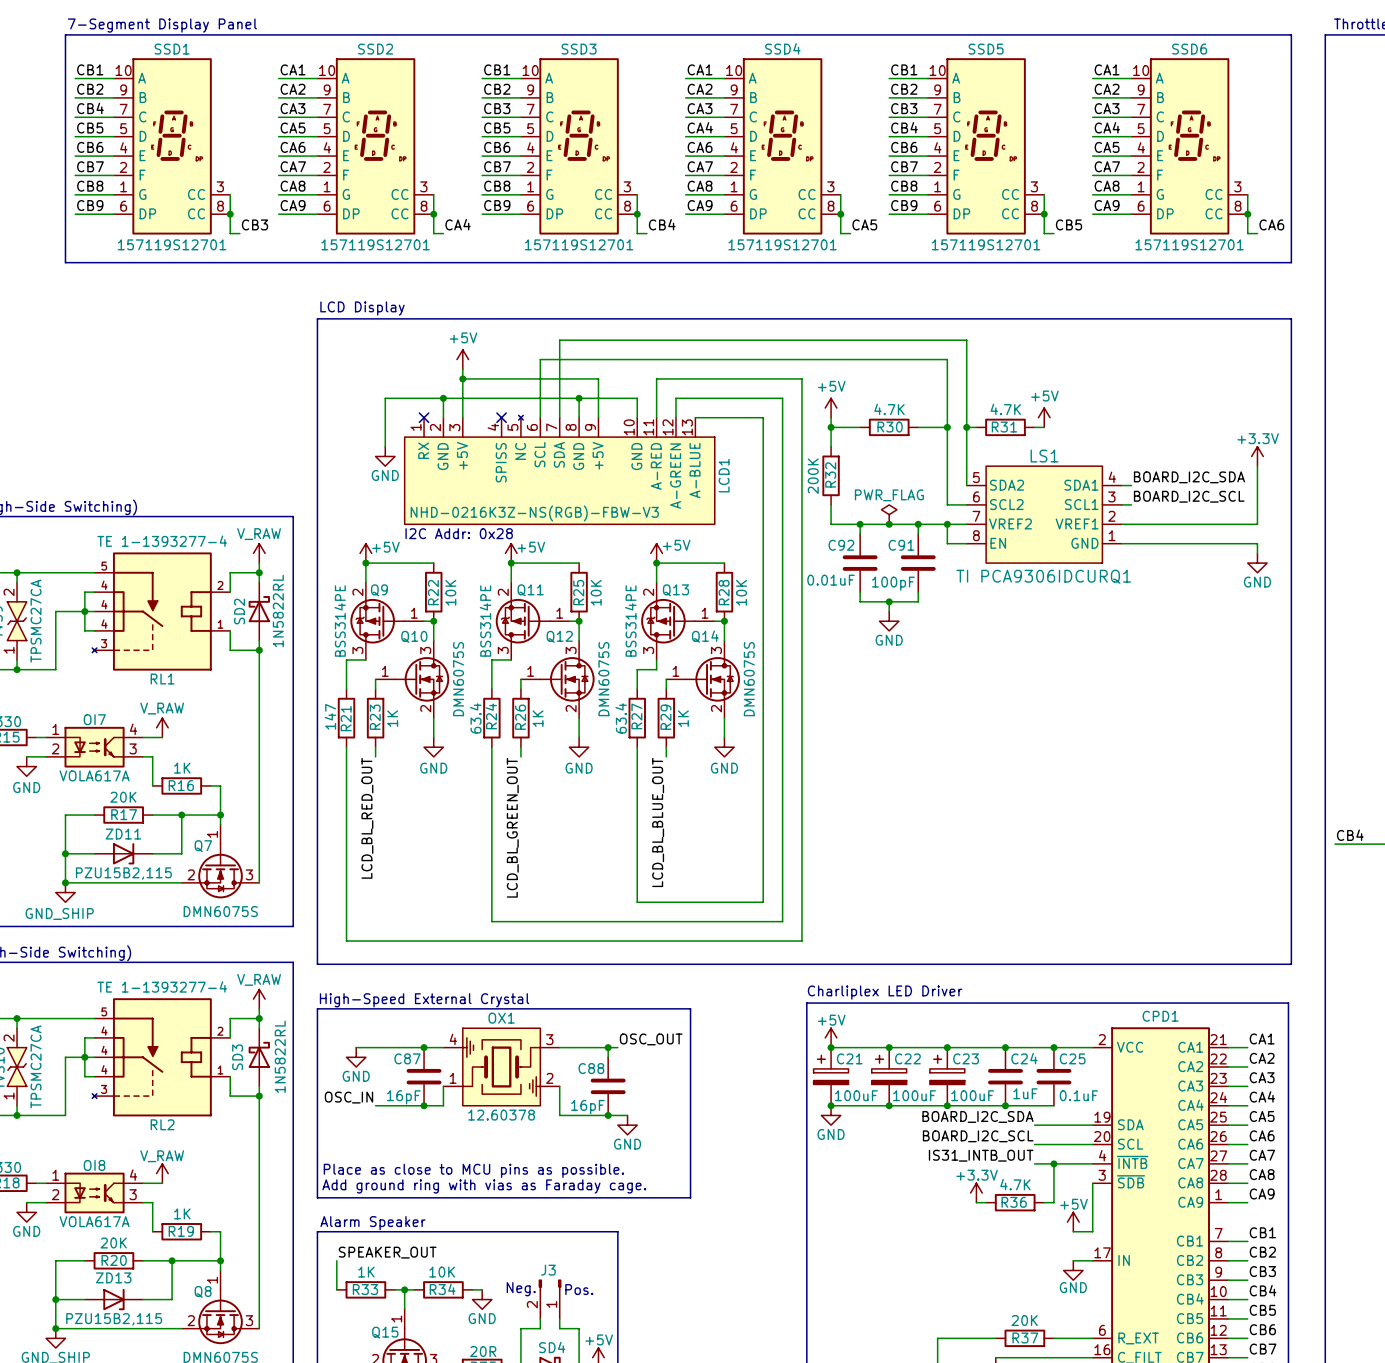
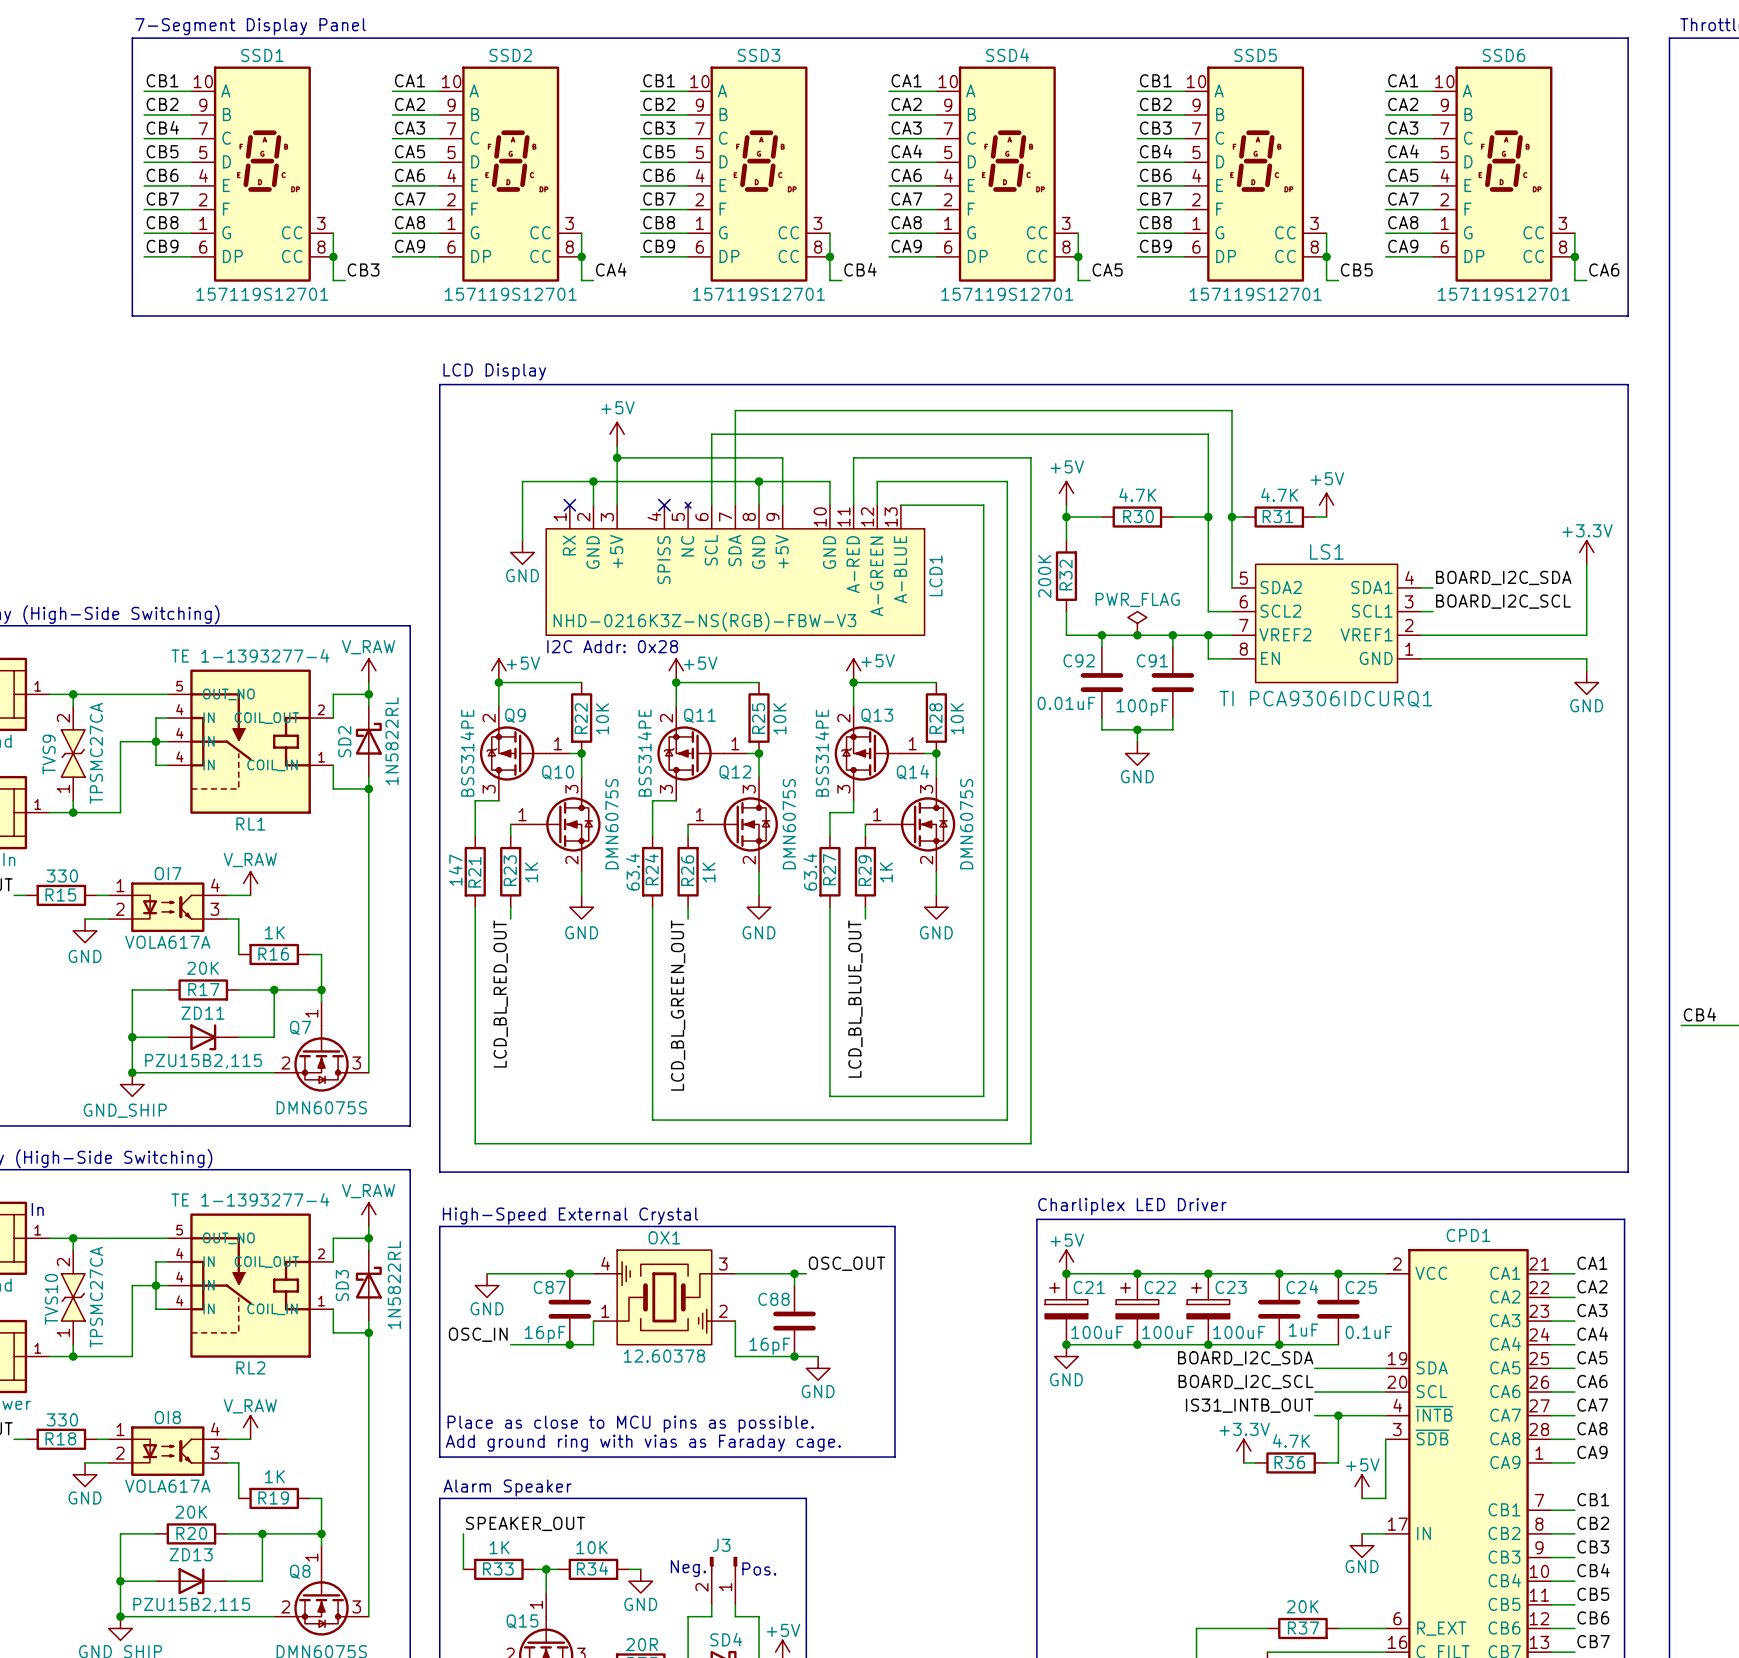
RL1 symbol: [92, 552, 231, 671] -> [167, 669, 334, 814]
RL2 symbol: [92, 998, 231, 1117] -> [167, 1213, 334, 1358]

